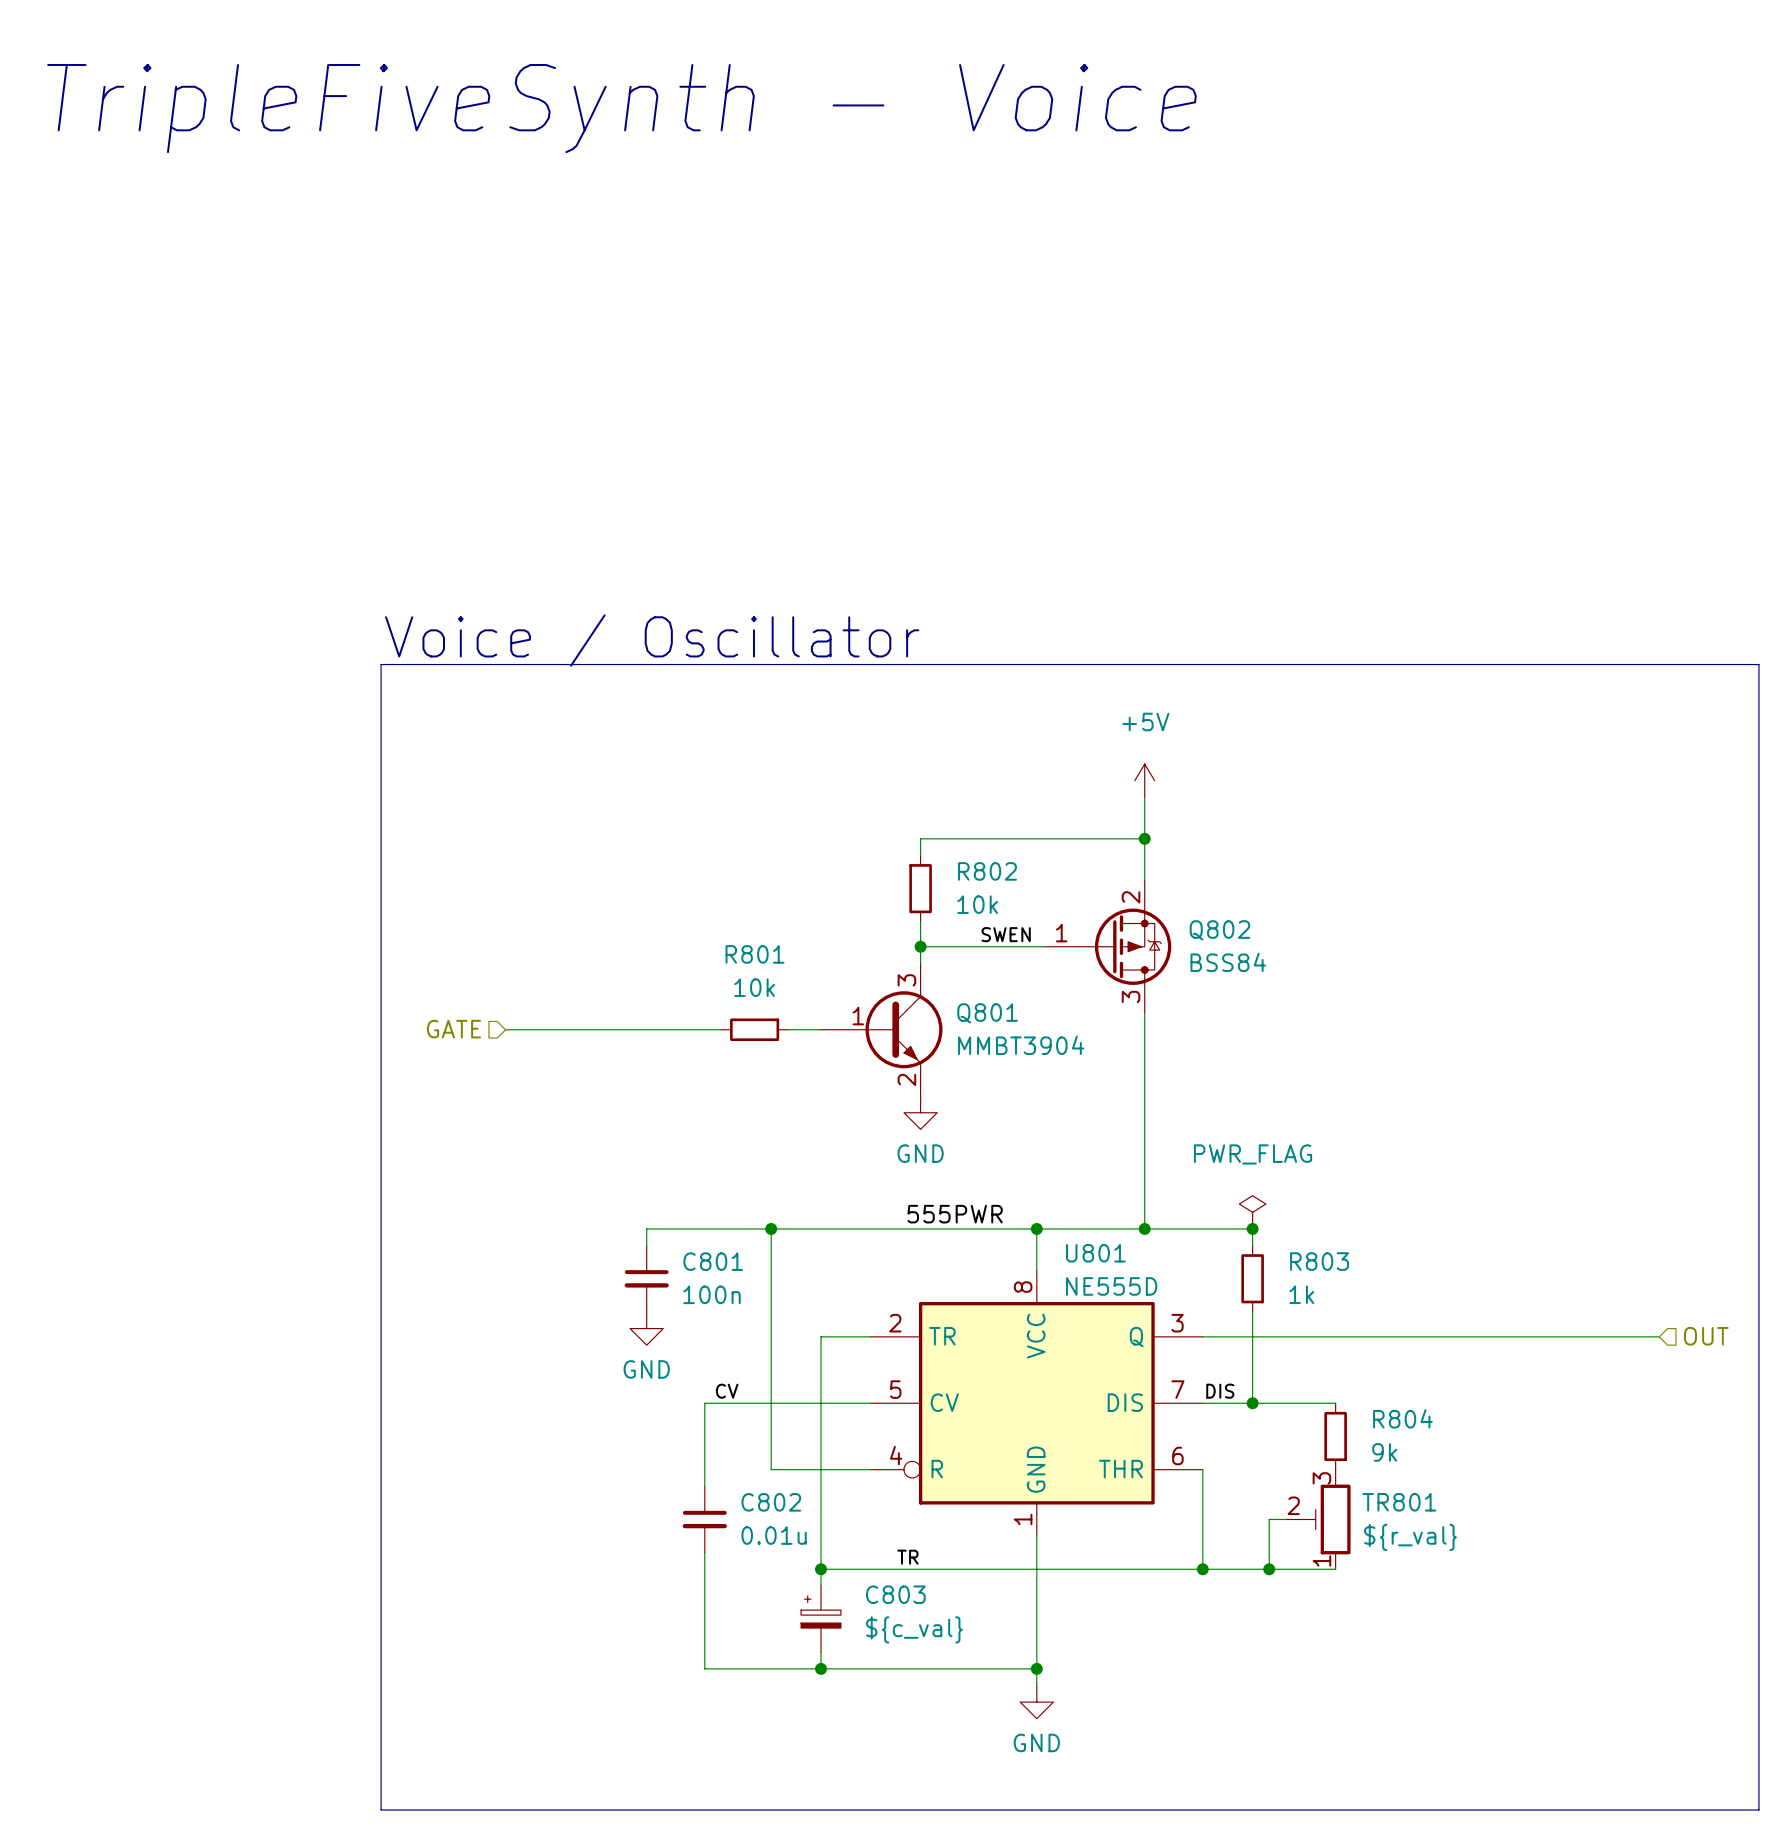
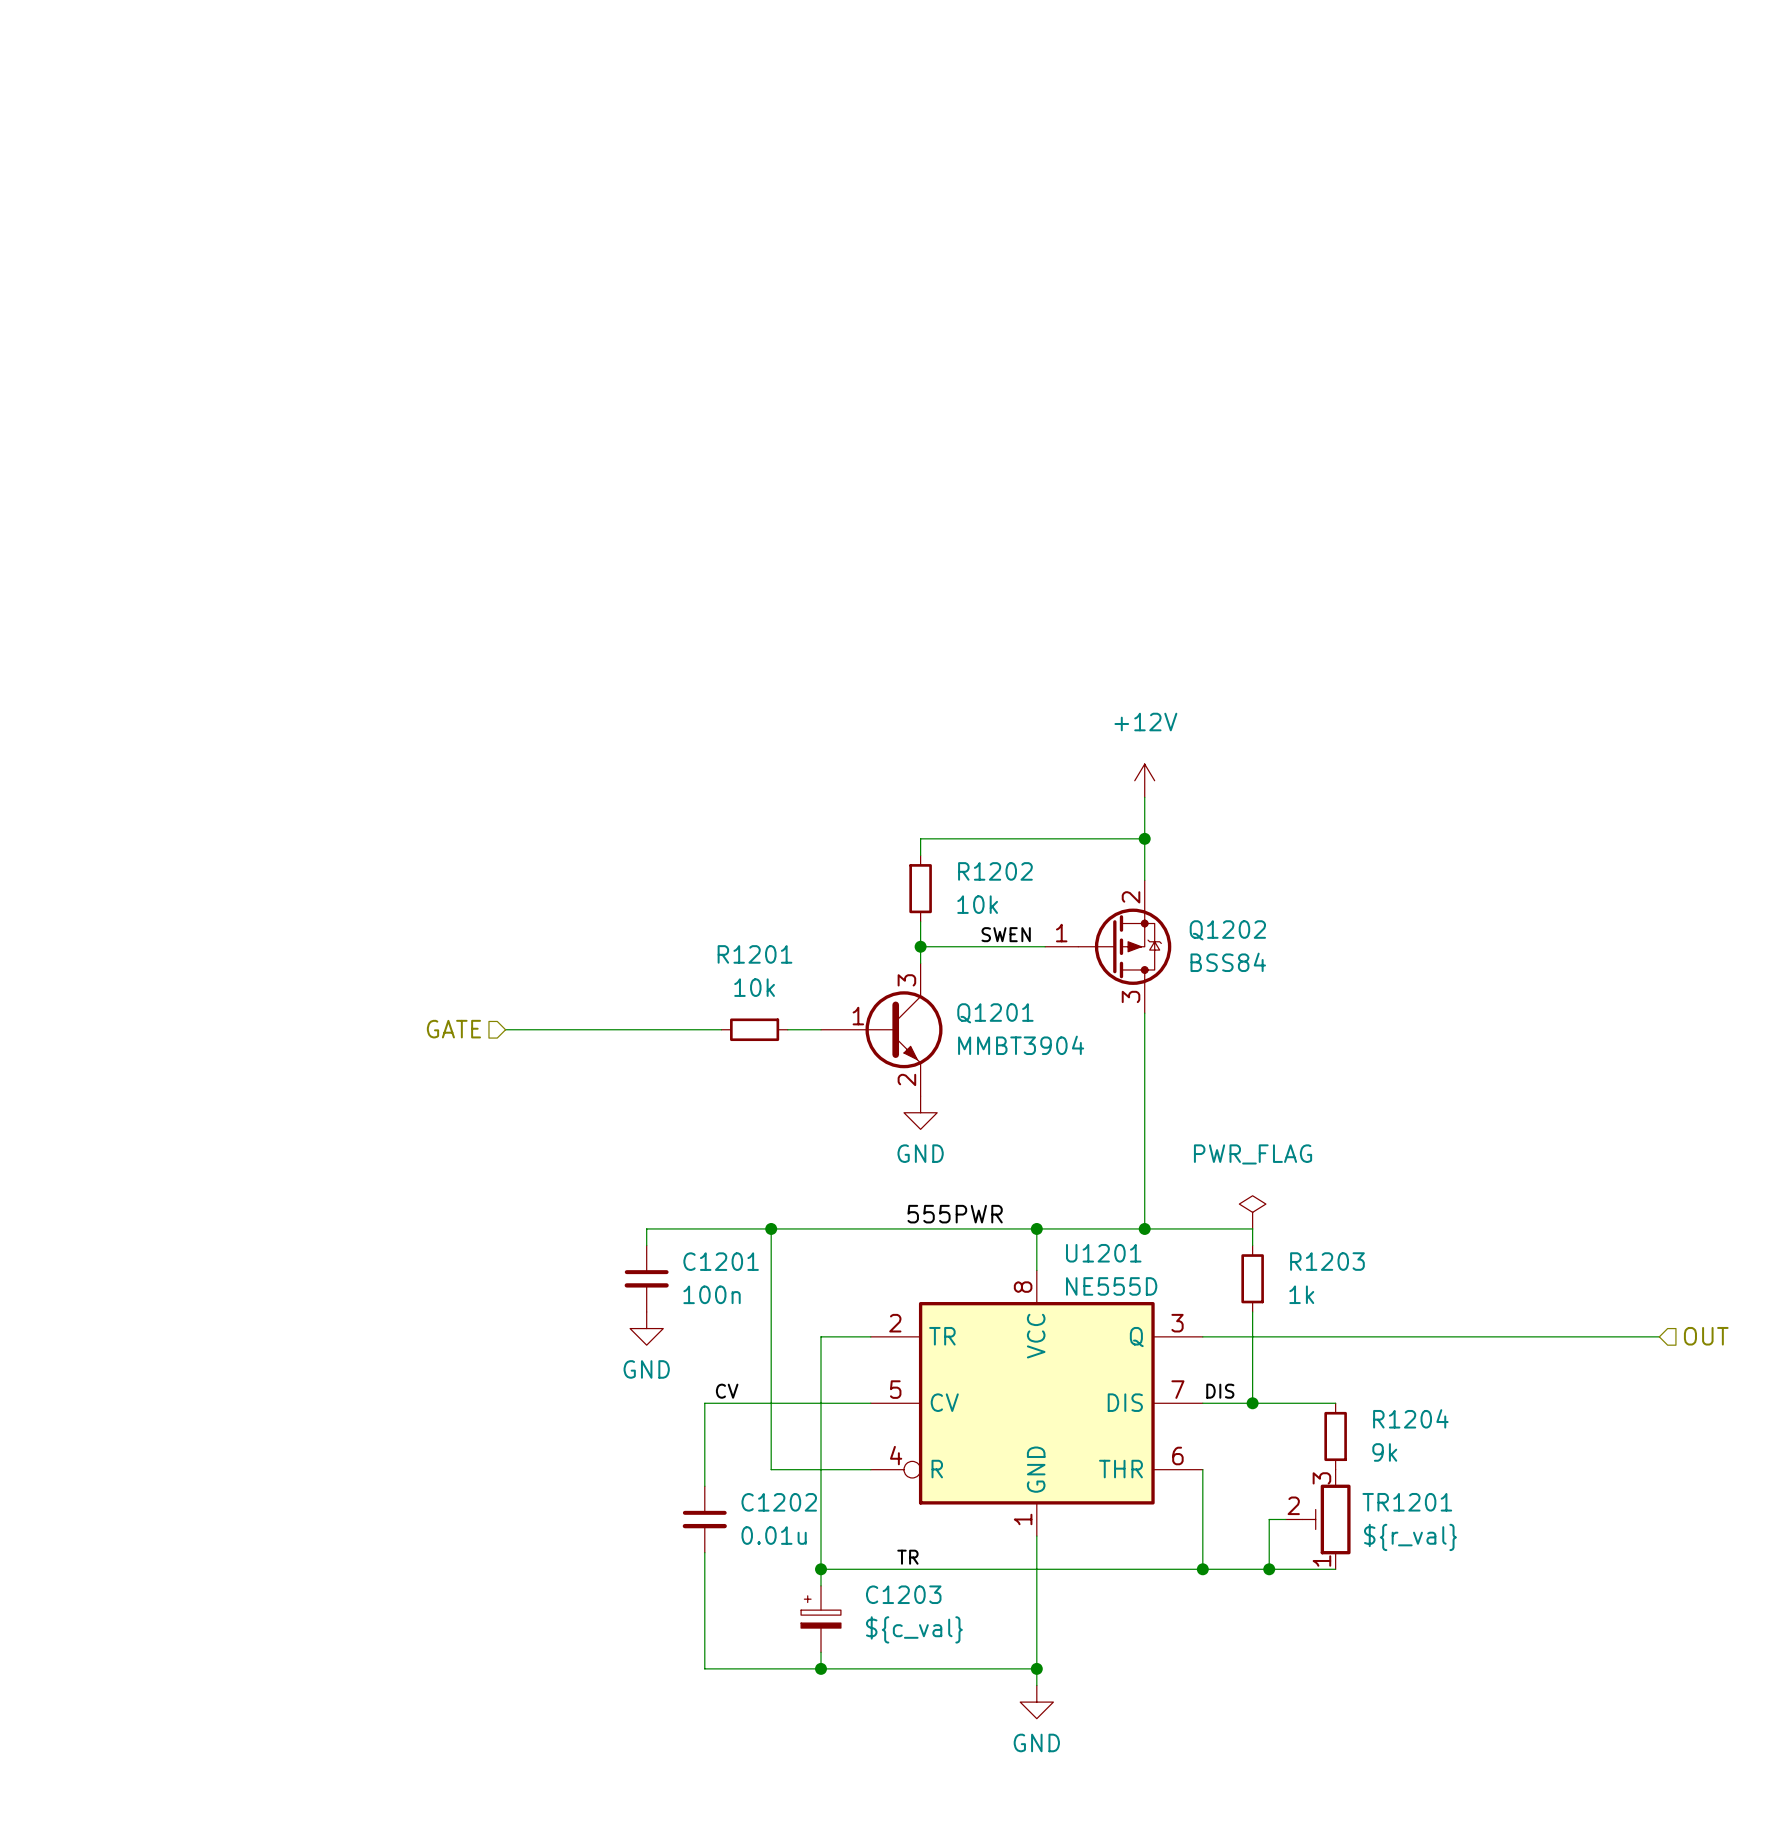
text: TripleFiveSynth - Voice (621, 108) -> none
text: Voice / Oscillator (652, 640) -> none
line: (381, 664) (1758, 664) (1758, 1810) (381, 1810) (381, 664) -> none
power symbol: +5V (1144, 780) -> +12V (1144, 780)
R802 name: R802 (987, 871) -> R1202 (995, 871)
Q802 name: Q802 (1219, 930) -> Q1202 (1227, 930)
R801 name: R801 (754, 954) -> R1201 (754, 954)
Q801 name: Q801 (987, 1013) -> Q1201 (995, 1013)
junction: (1252, 1228) -> none
U801 name: U801 (1095, 1253) -> U1201 (1103, 1253)
C801 name: C801 (713, 1261) -> C1201 (721, 1261)
R803 name: R803 (1319, 1261) -> R1203 (1327, 1261)
R804 name: R804 (1402, 1418) -> R1204 (1410, 1418)
C802 name: C802 (771, 1502) -> C1202 (779, 1502)
TR801 name: TR801 (1399, 1502) -> TR1201 (1407, 1502)
C803 name: C803 (895, 1594) -> C1203 (903, 1594)

